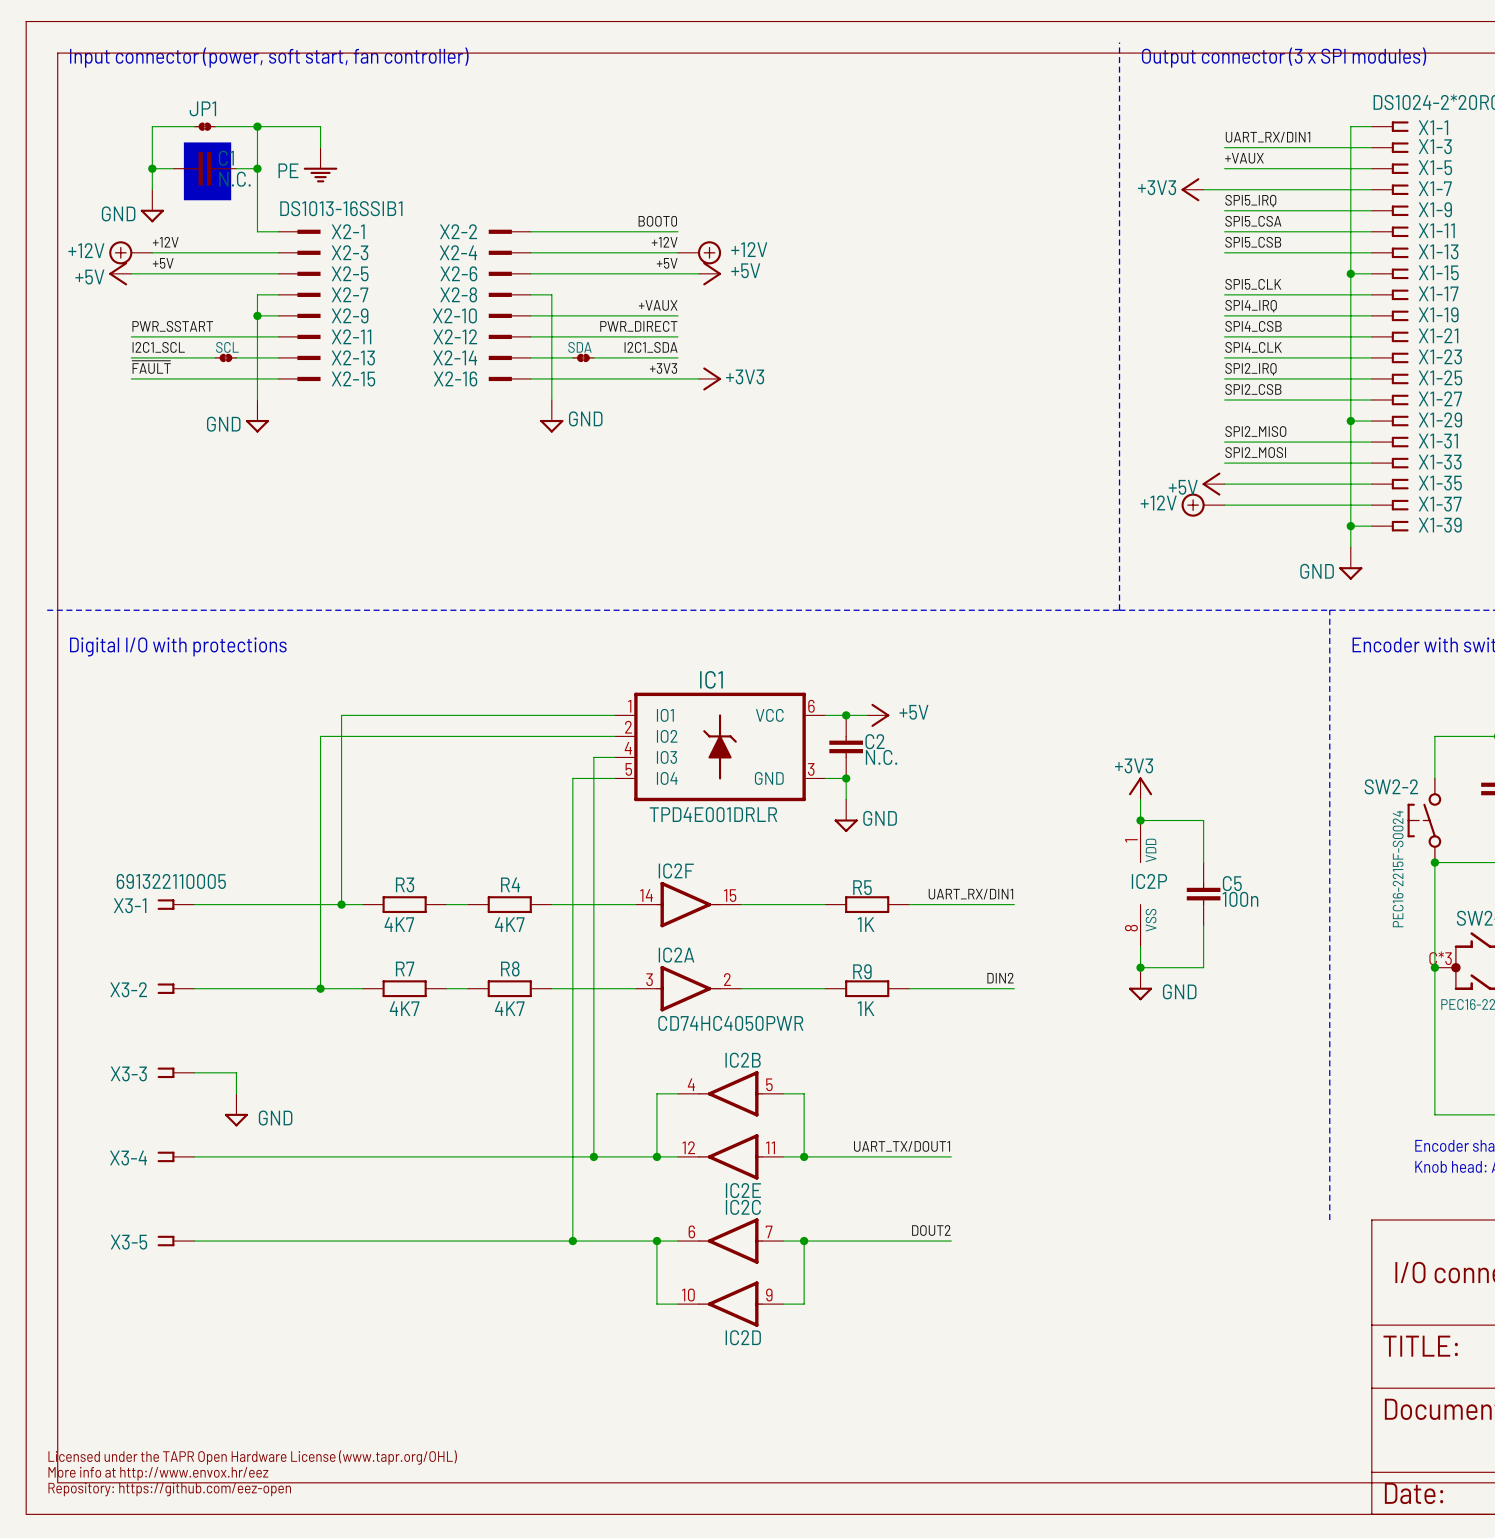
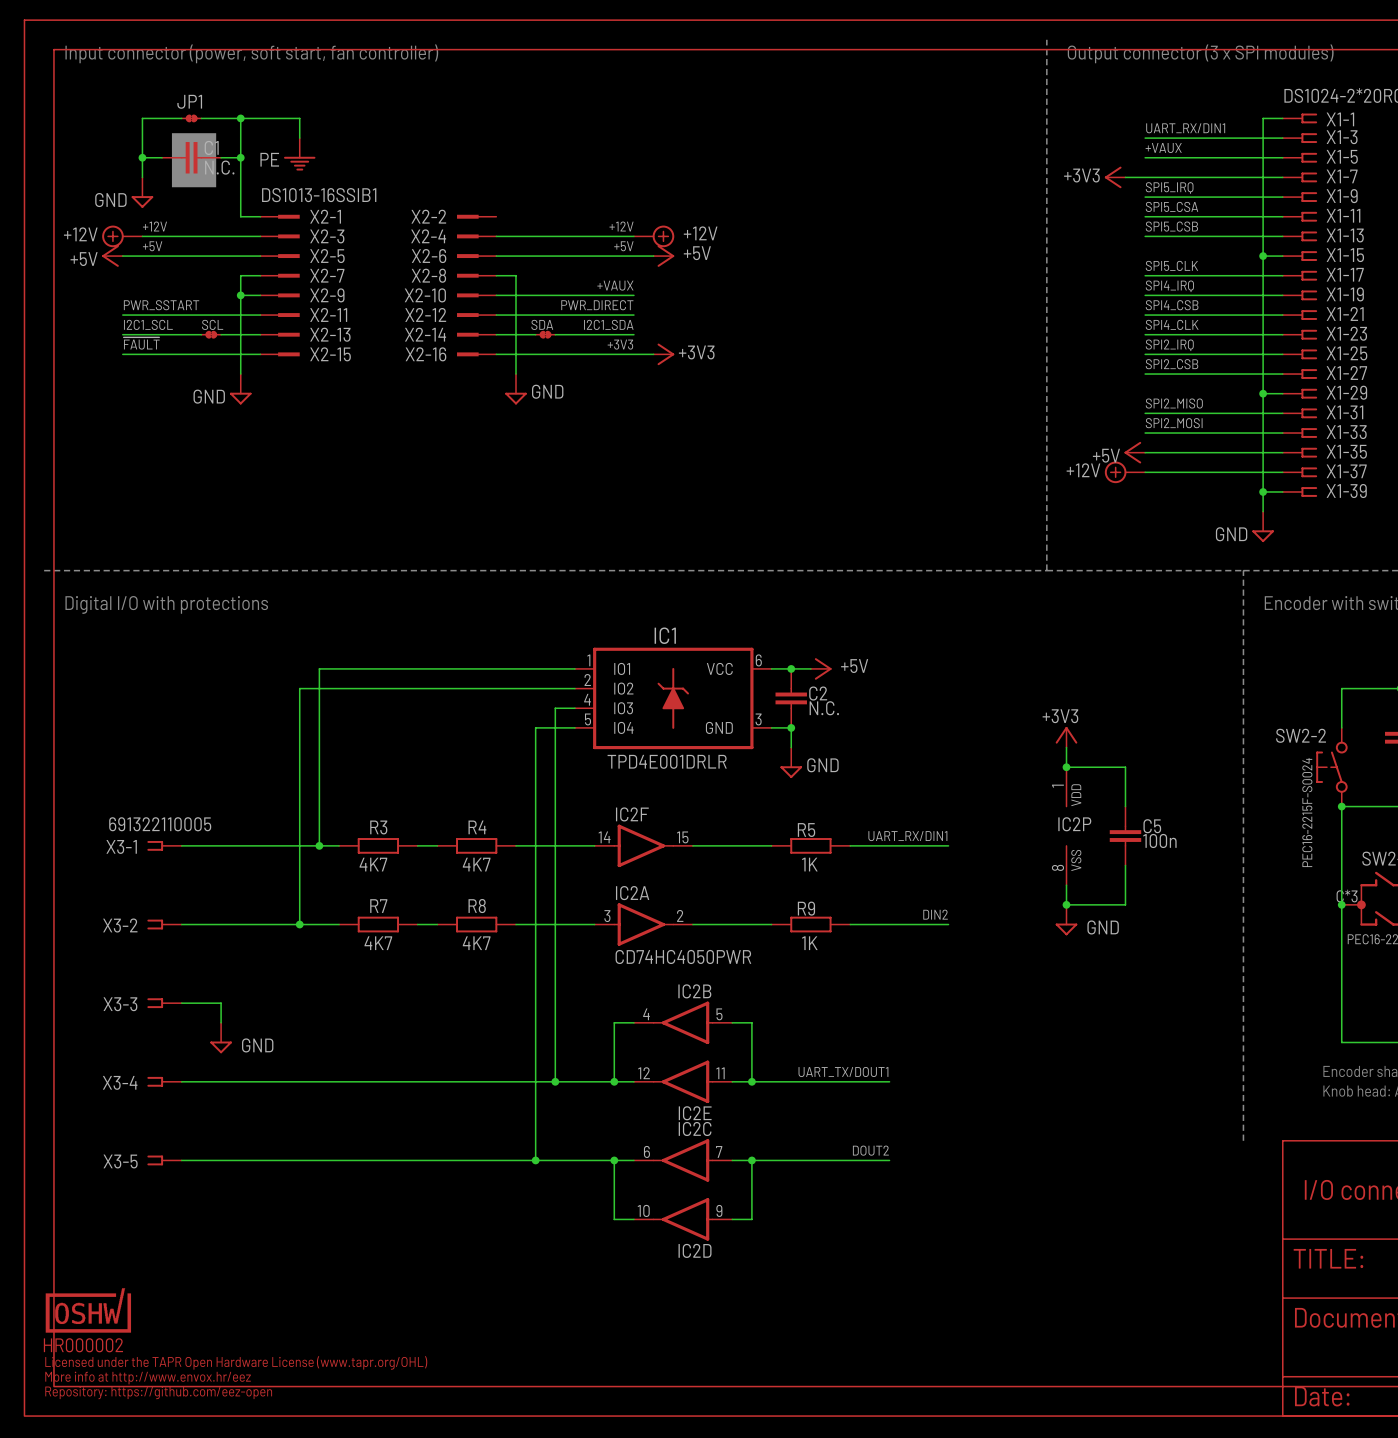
label: BOOT0 (657, 221) -> none
wire: (530, 231) (677, 231) -> none
part: none -> HR000002 (88, 1310)

